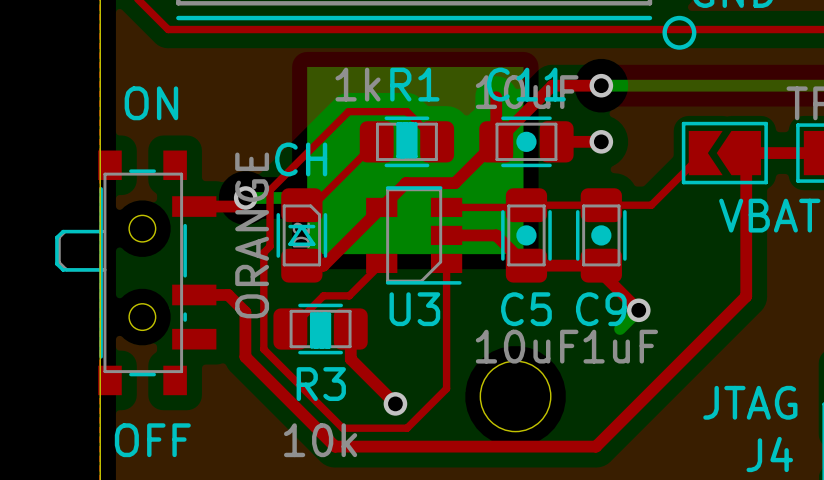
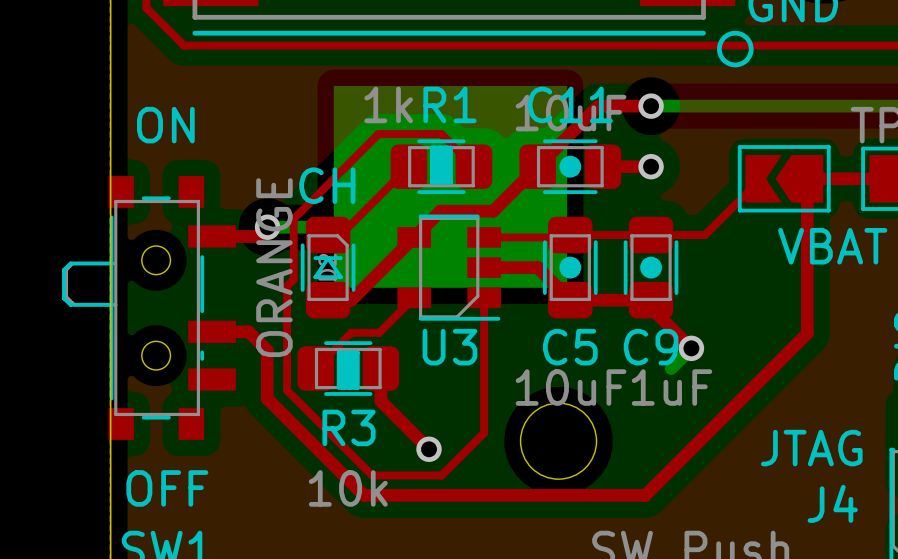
top track: (496, 97) (496, 141) -> none

